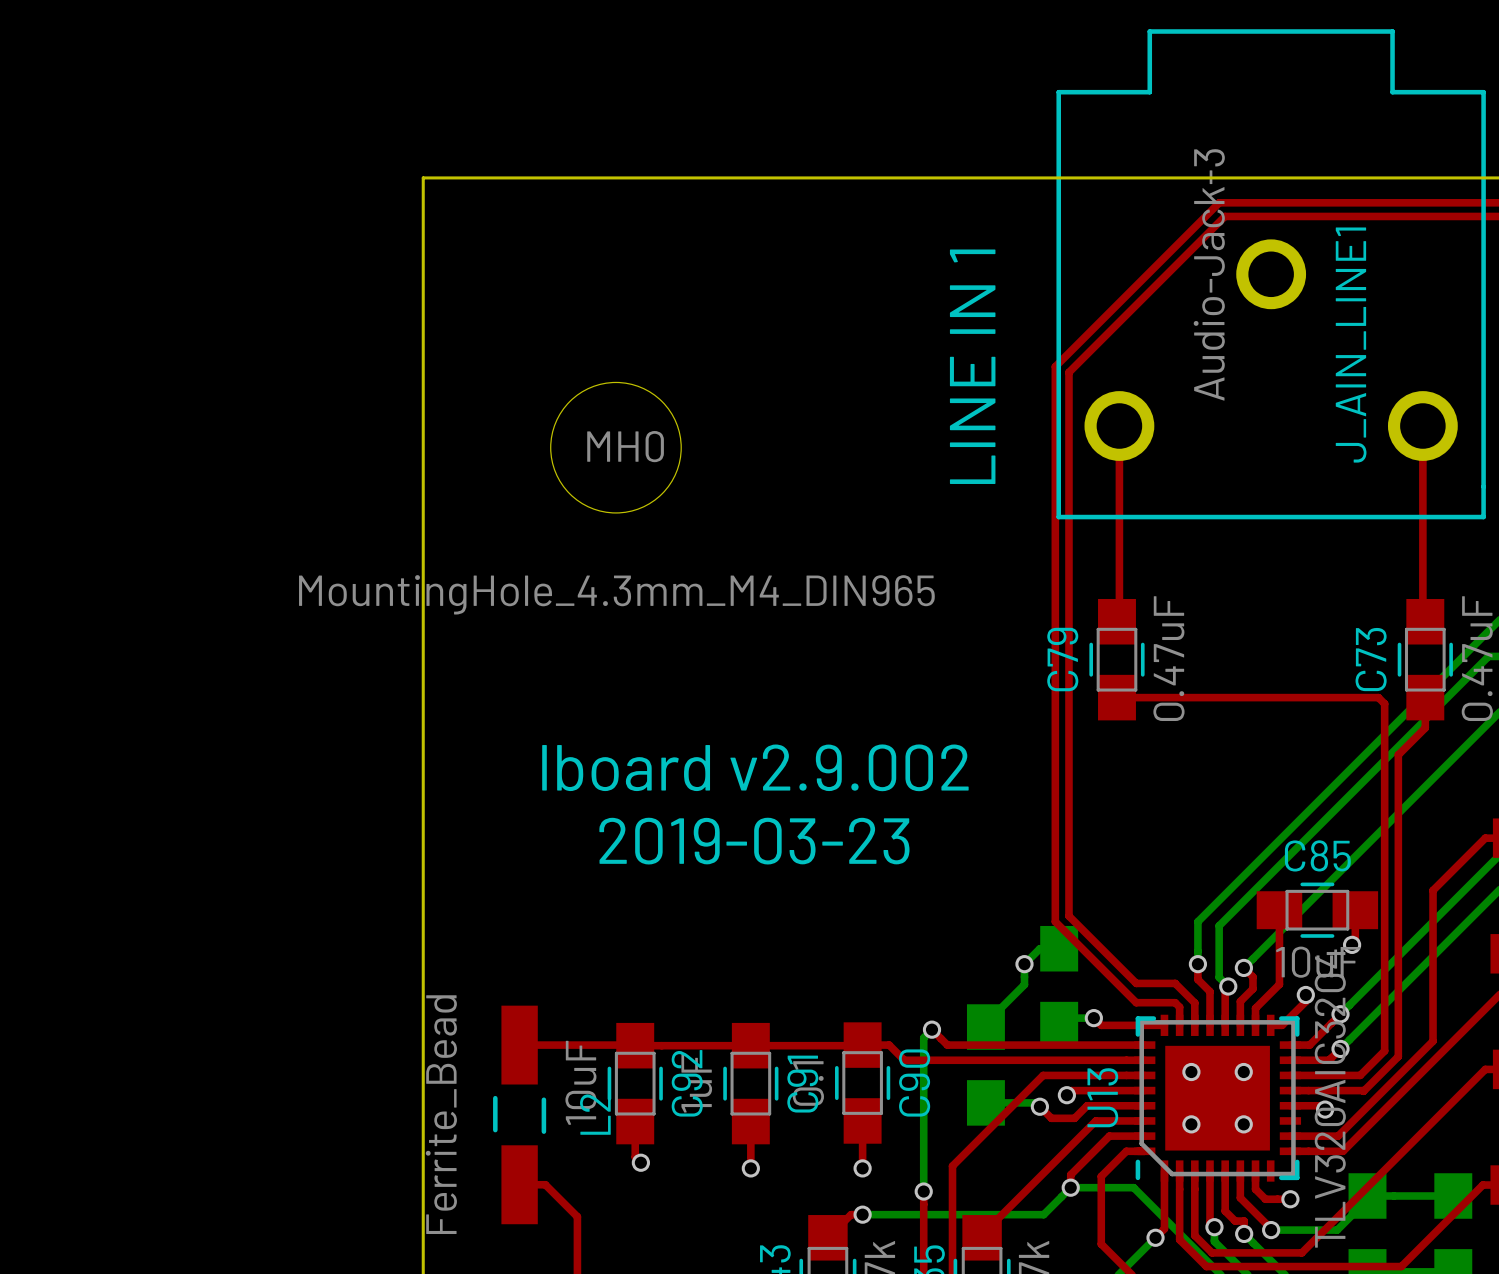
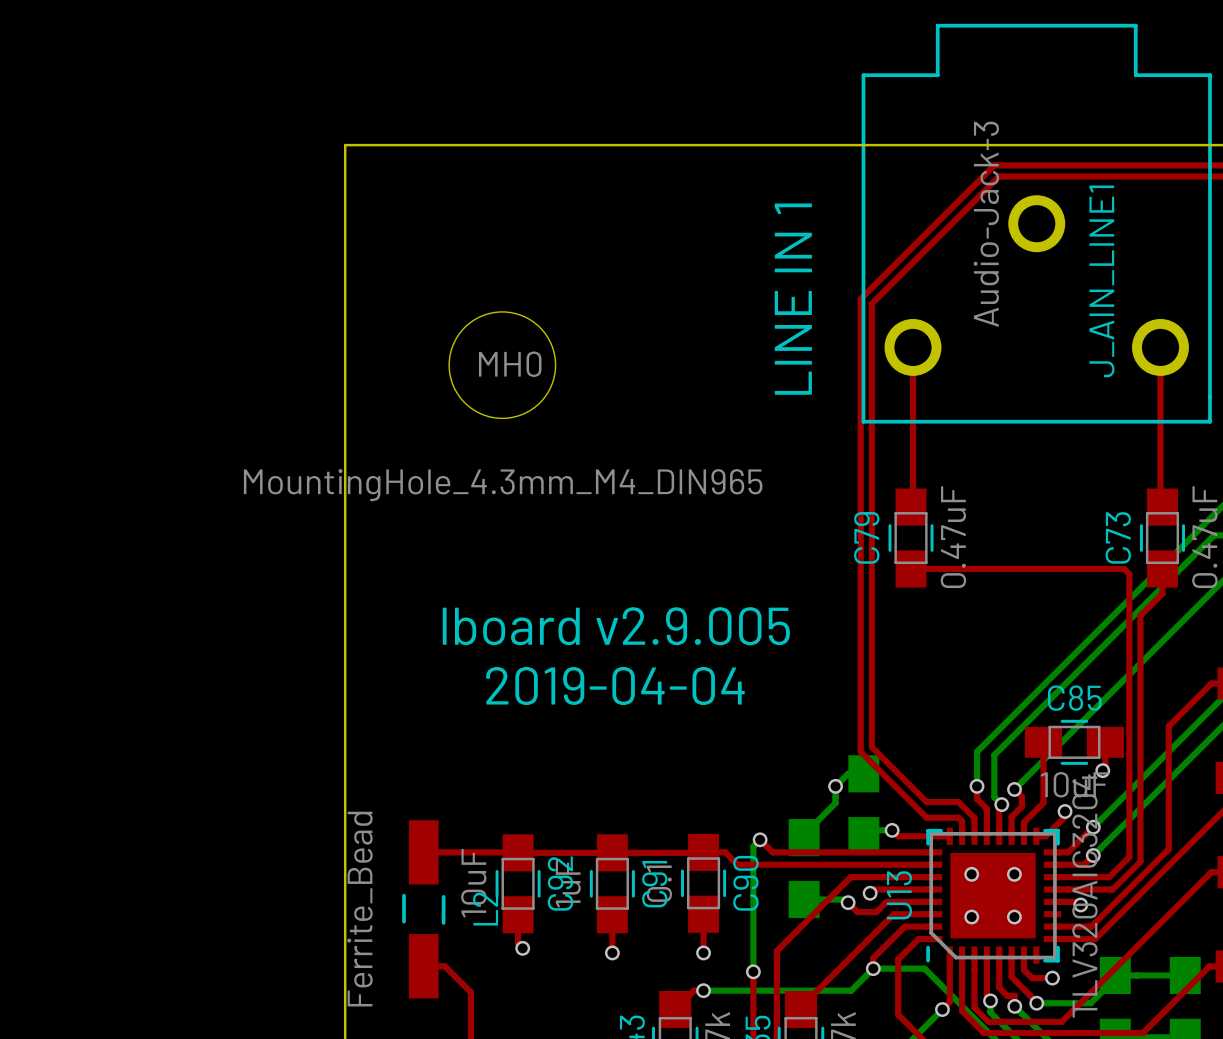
text: lboard v2.9.002 (755, 767) -> lboard v2.9.005 (616, 626)
text: 2019-03-23 (754, 841) -> 2019-04-04 (615, 686)

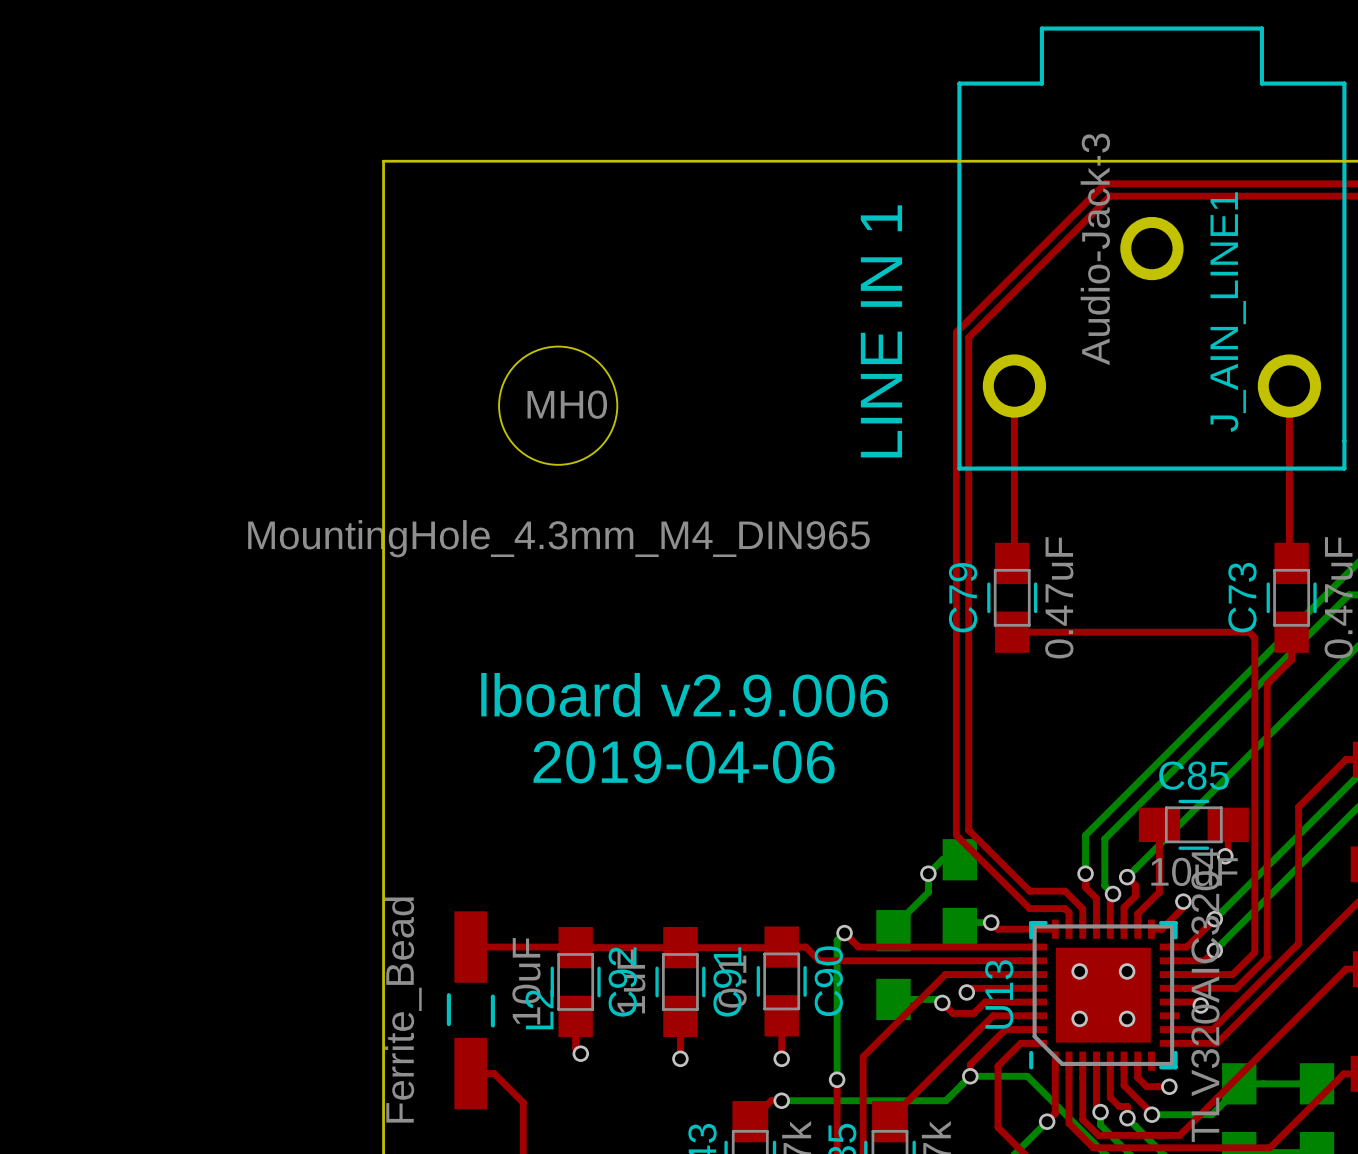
text: lboard v2.9.005 (616, 626) -> lboard v2.9.006 (684, 694)
text: 2019-04-04 (615, 686) -> 2019-04-06 (684, 762)

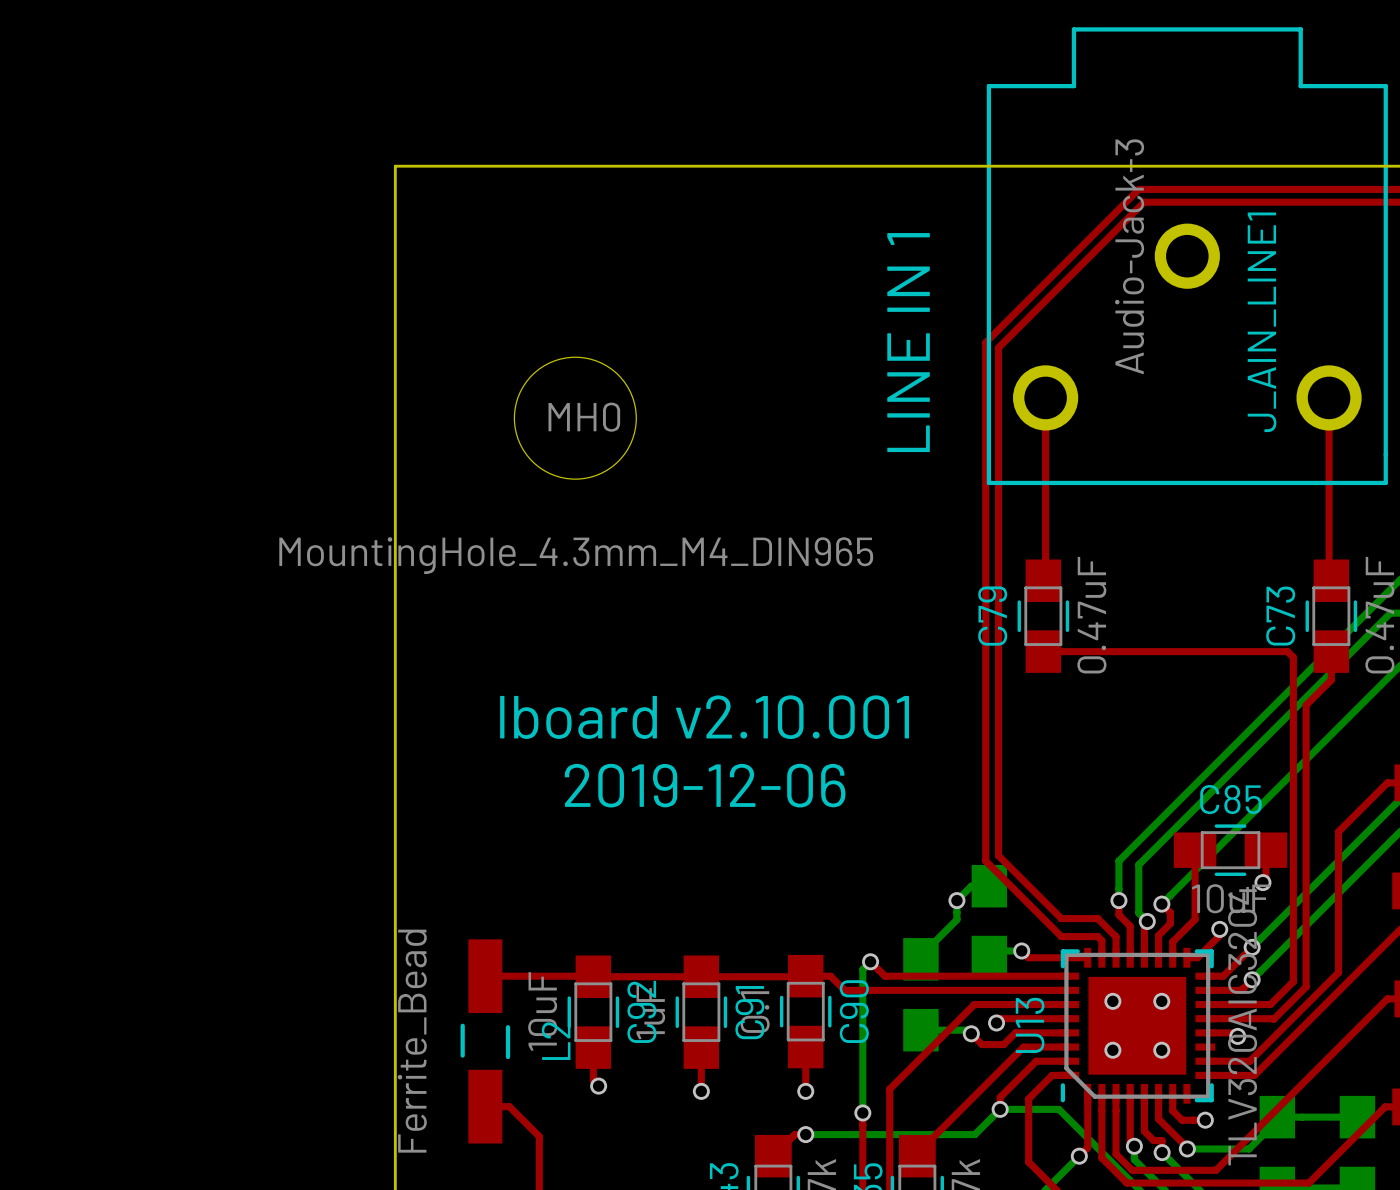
text: lboard v2.9.006 (684, 694) -> lboard v2.10.001 (704, 717)
text: 2019-04-06 (684, 762) -> 2019-12-06 (705, 785)

